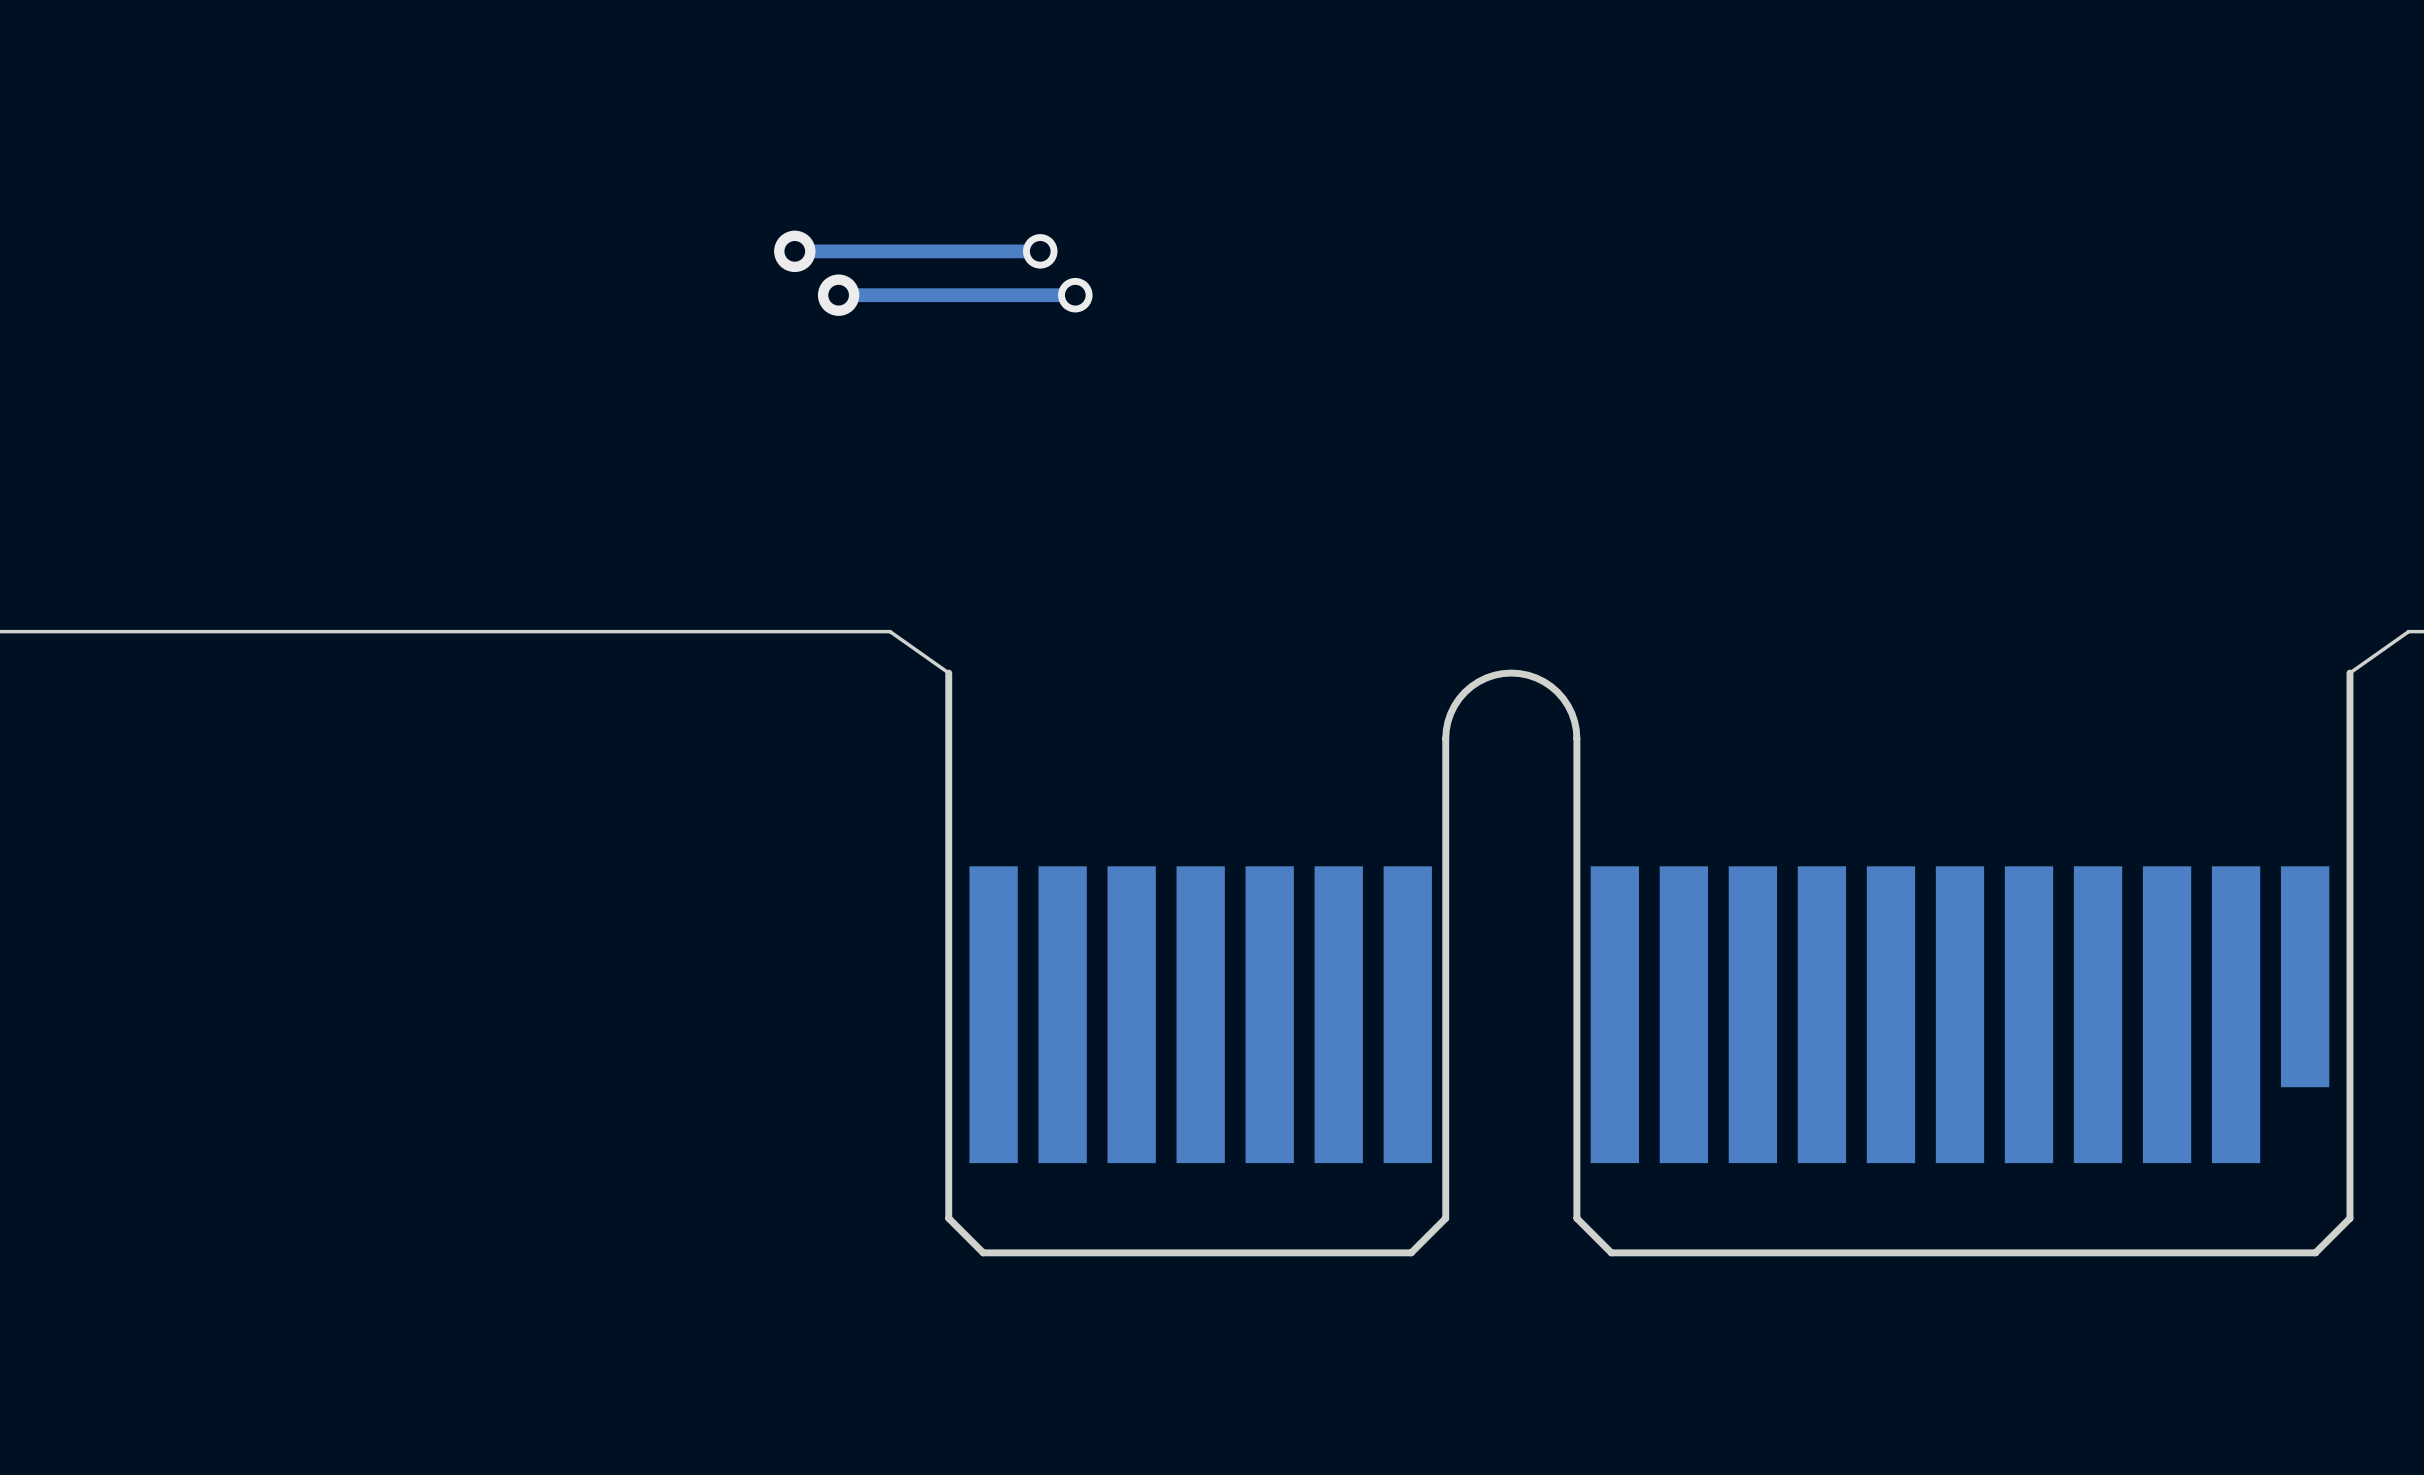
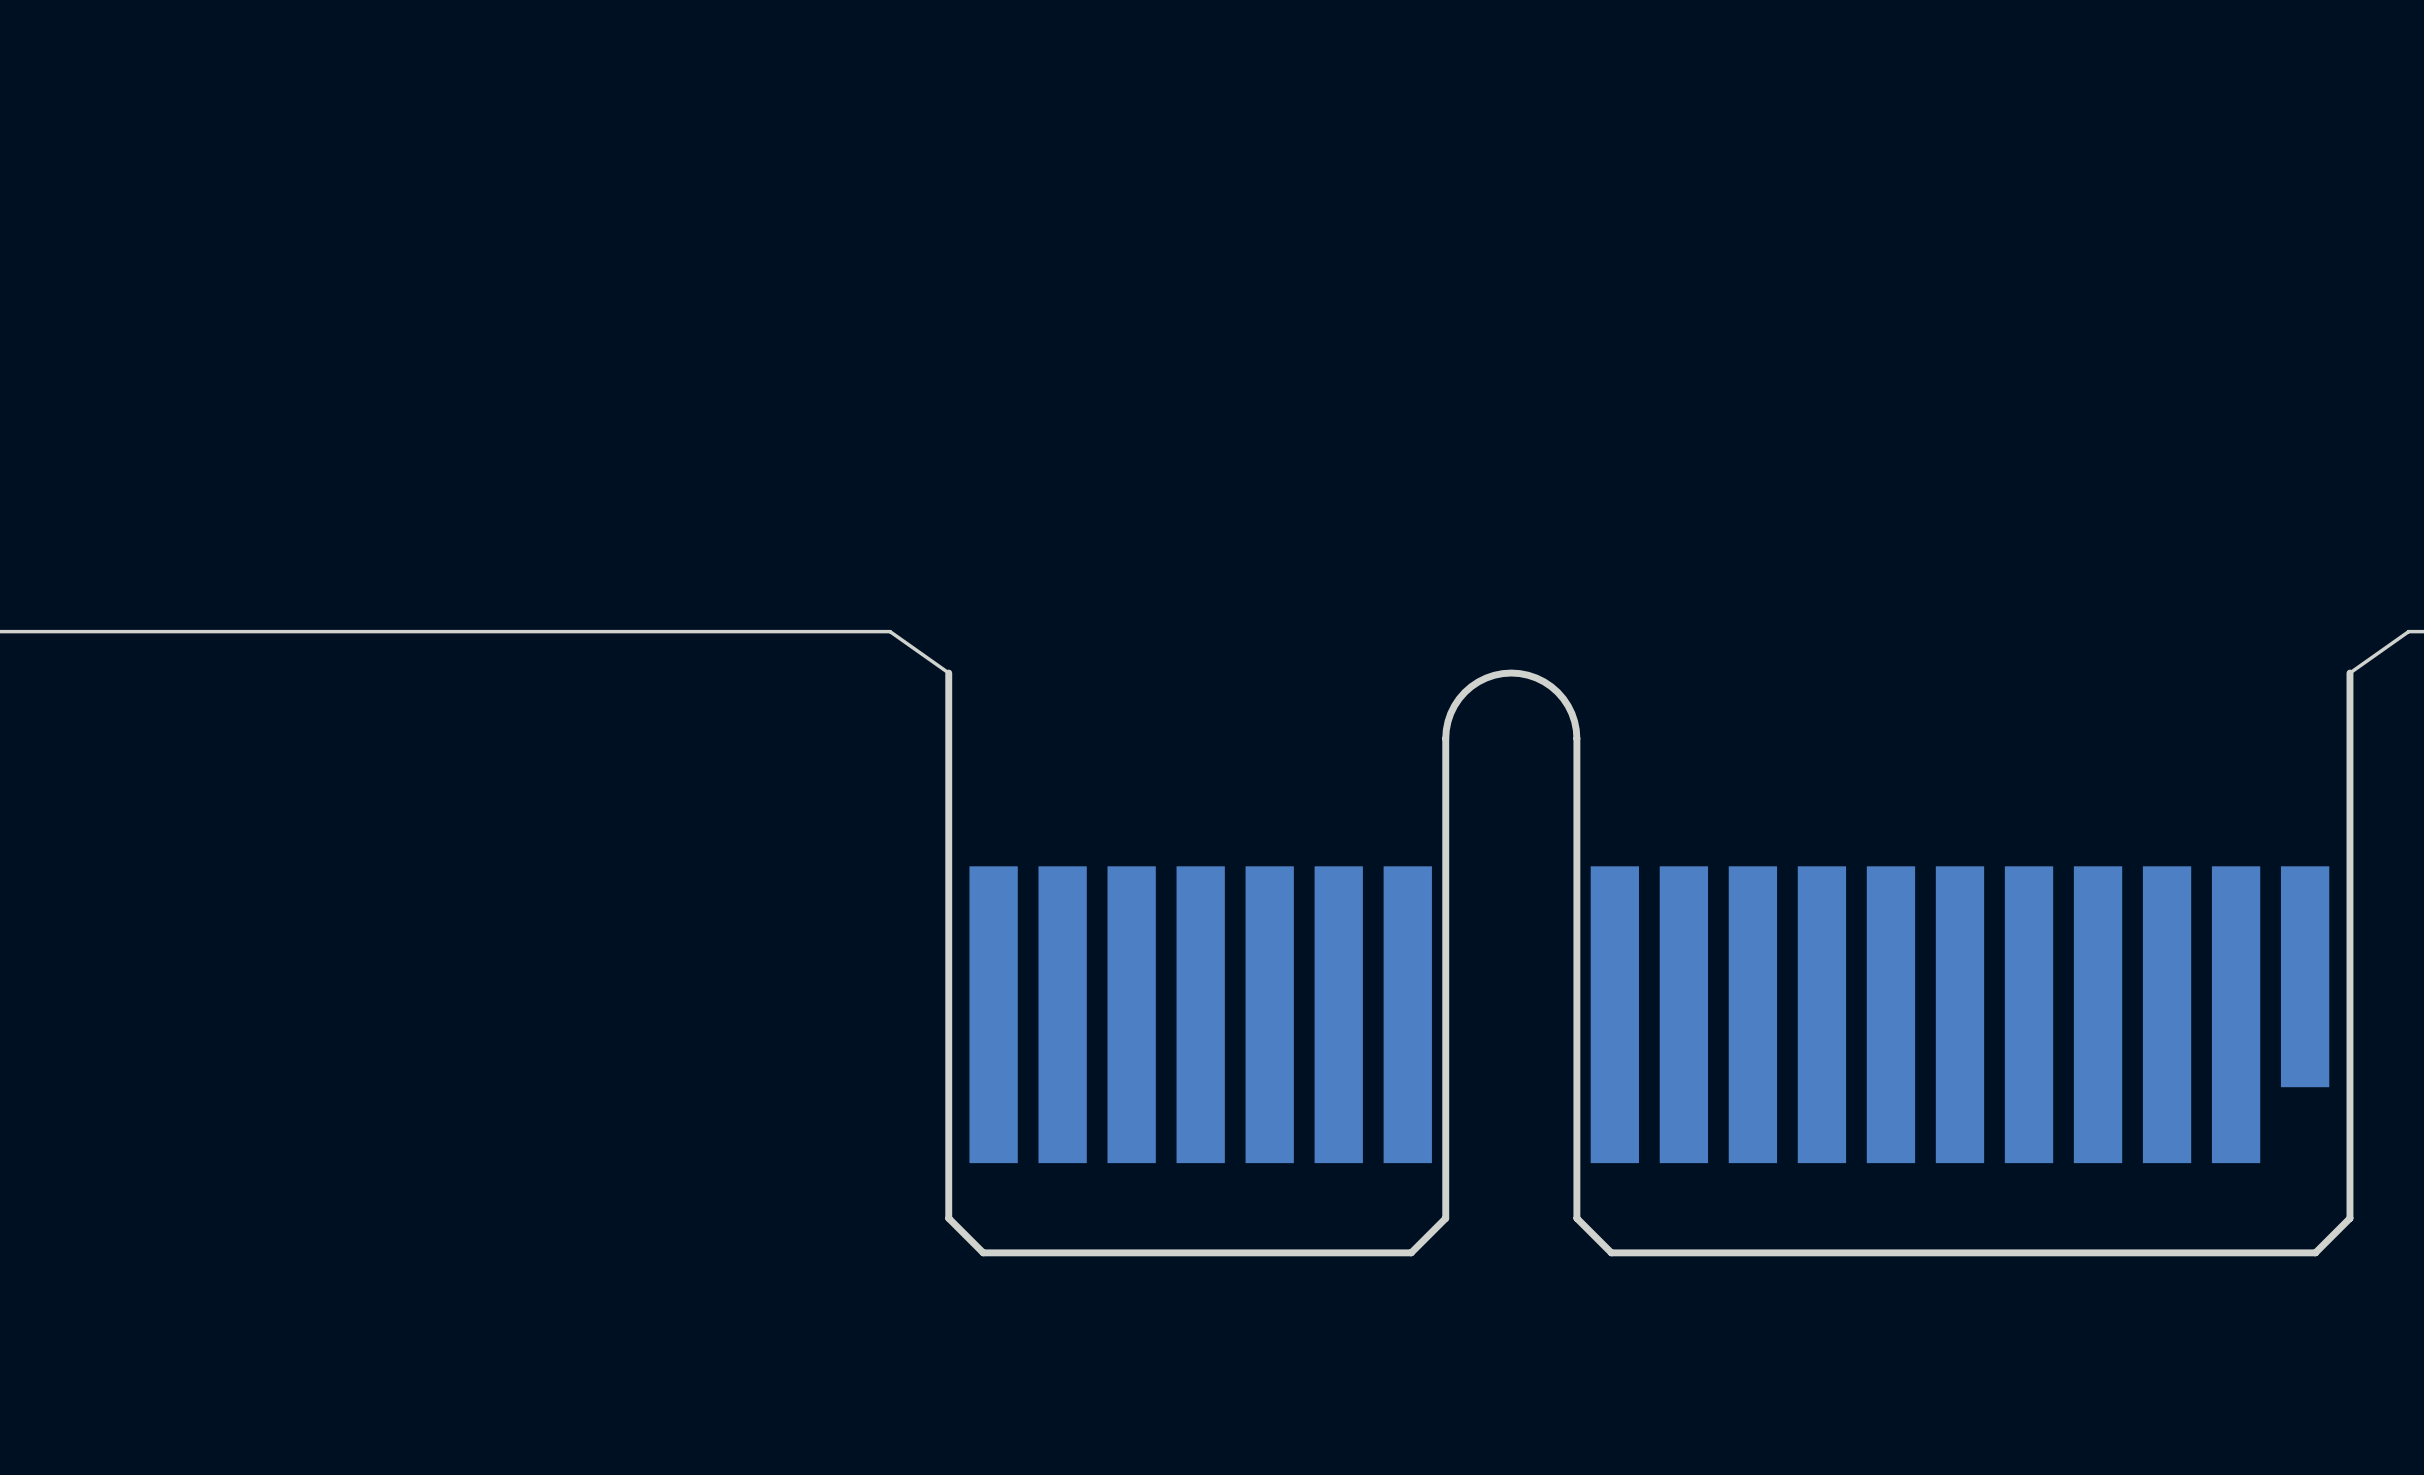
via: (794, 251) -> none
track: (1040, 251) (794, 251) -> none
via: (1040, 251) -> none
via: (838, 295) -> none
track: (1075, 295) (838, 295) -> none
via: (1075, 295) -> none

